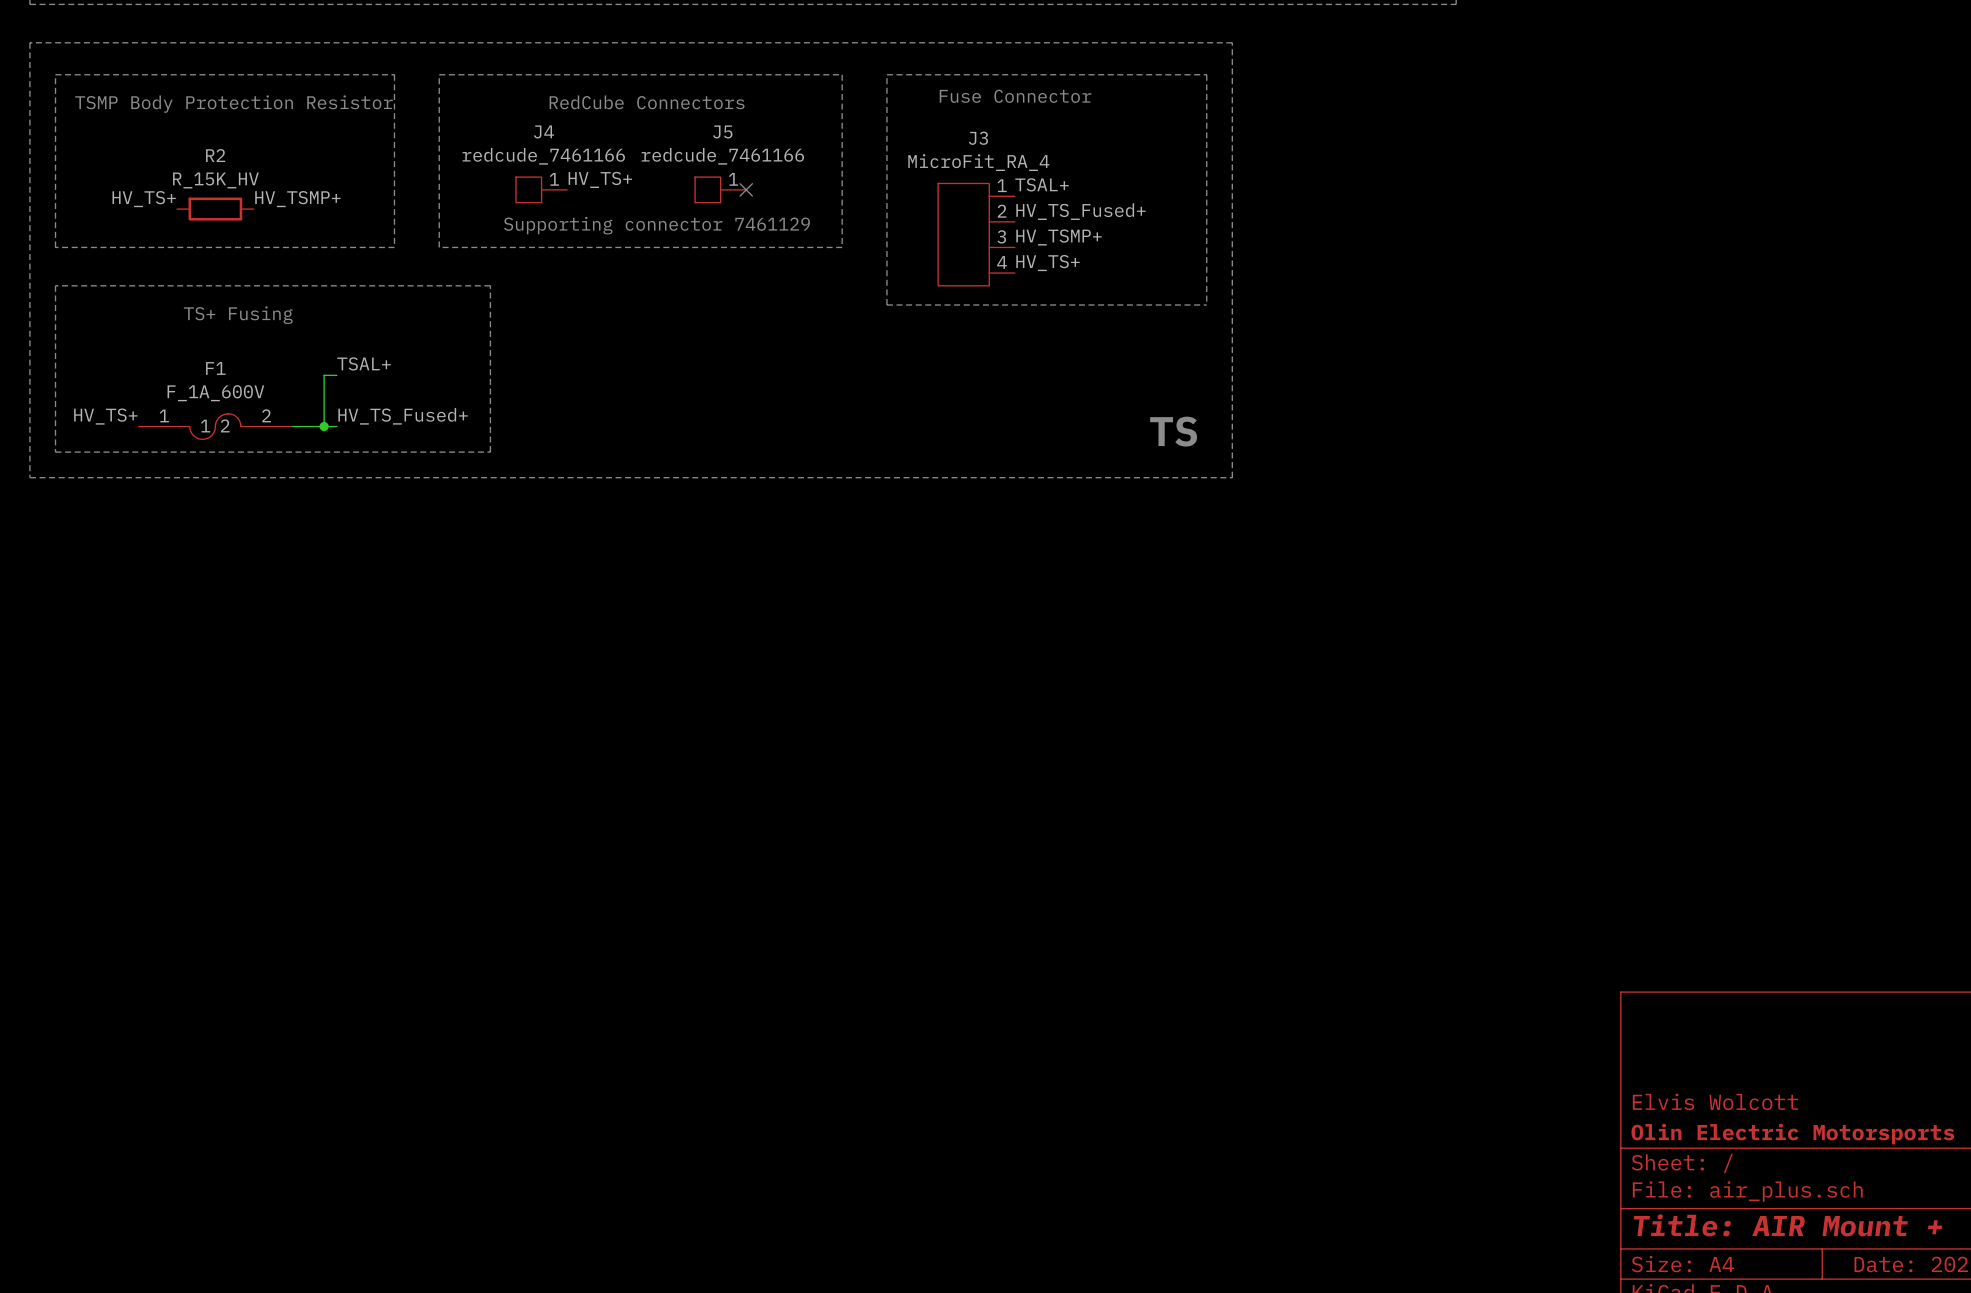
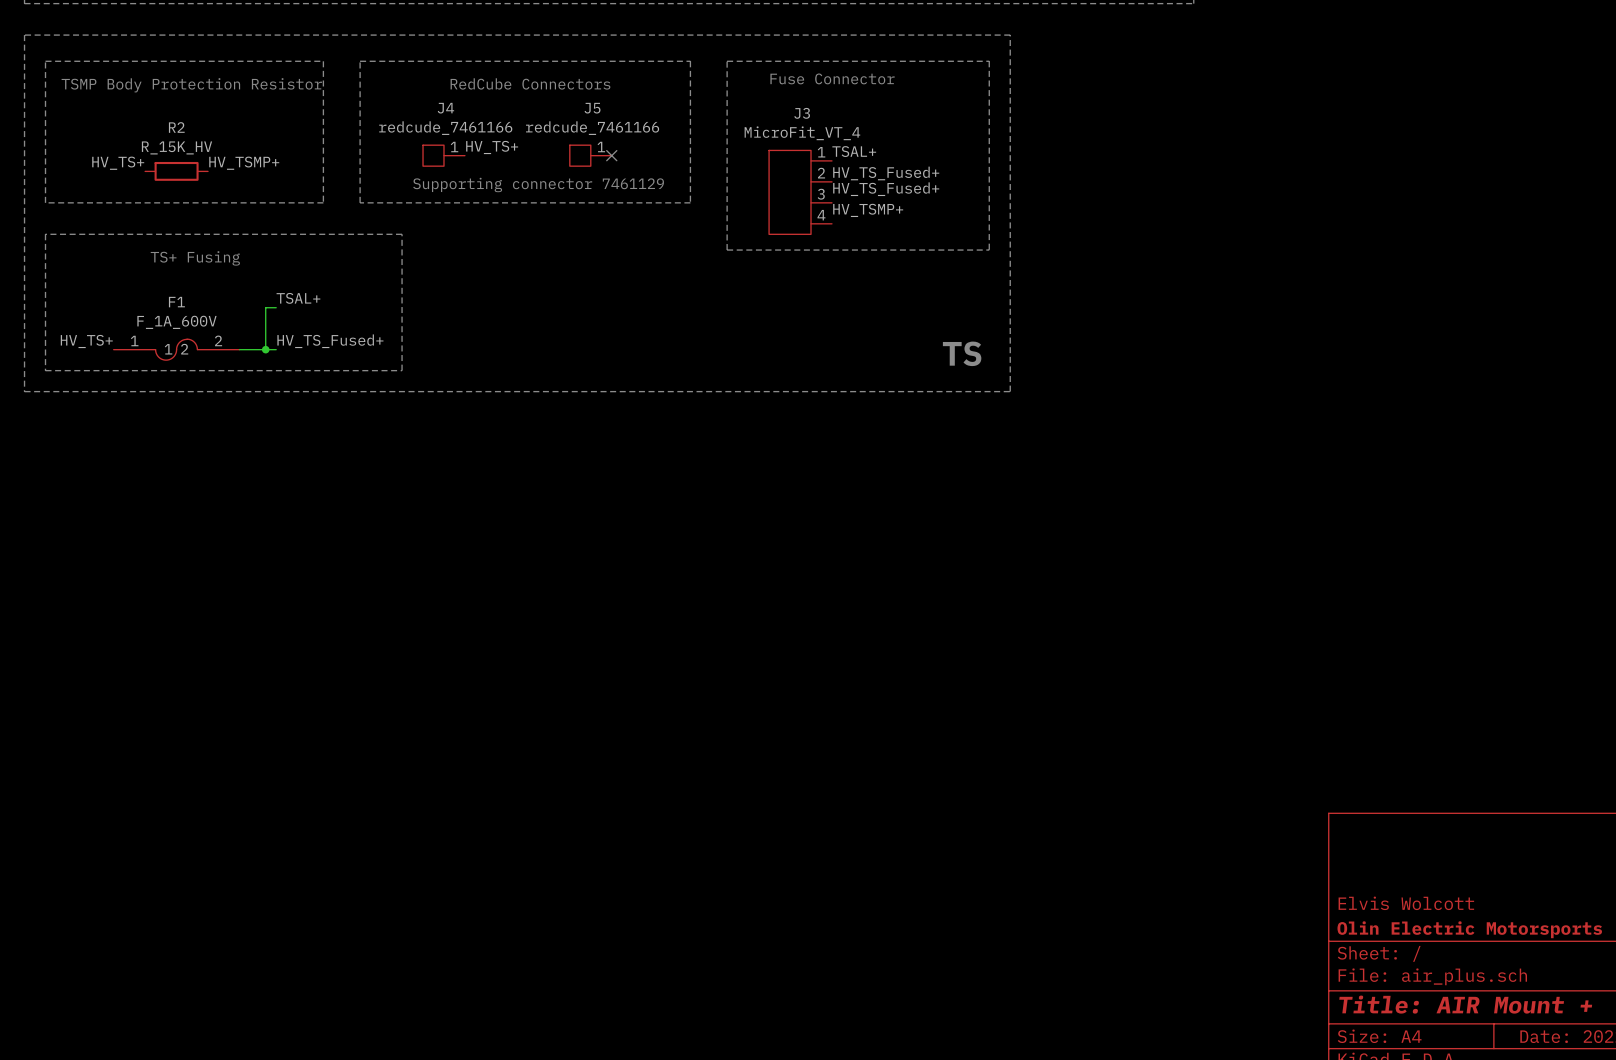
J3 value: MicroFit_RA_4 (978, 162) -> MicroFit_VT_4 (802, 133)
label: HV_TSMP+ (1059, 237) -> HV_TS_Fused+ (886, 189)
label: HV_TS+ (1048, 263) -> HV_TSMP+ (868, 210)

